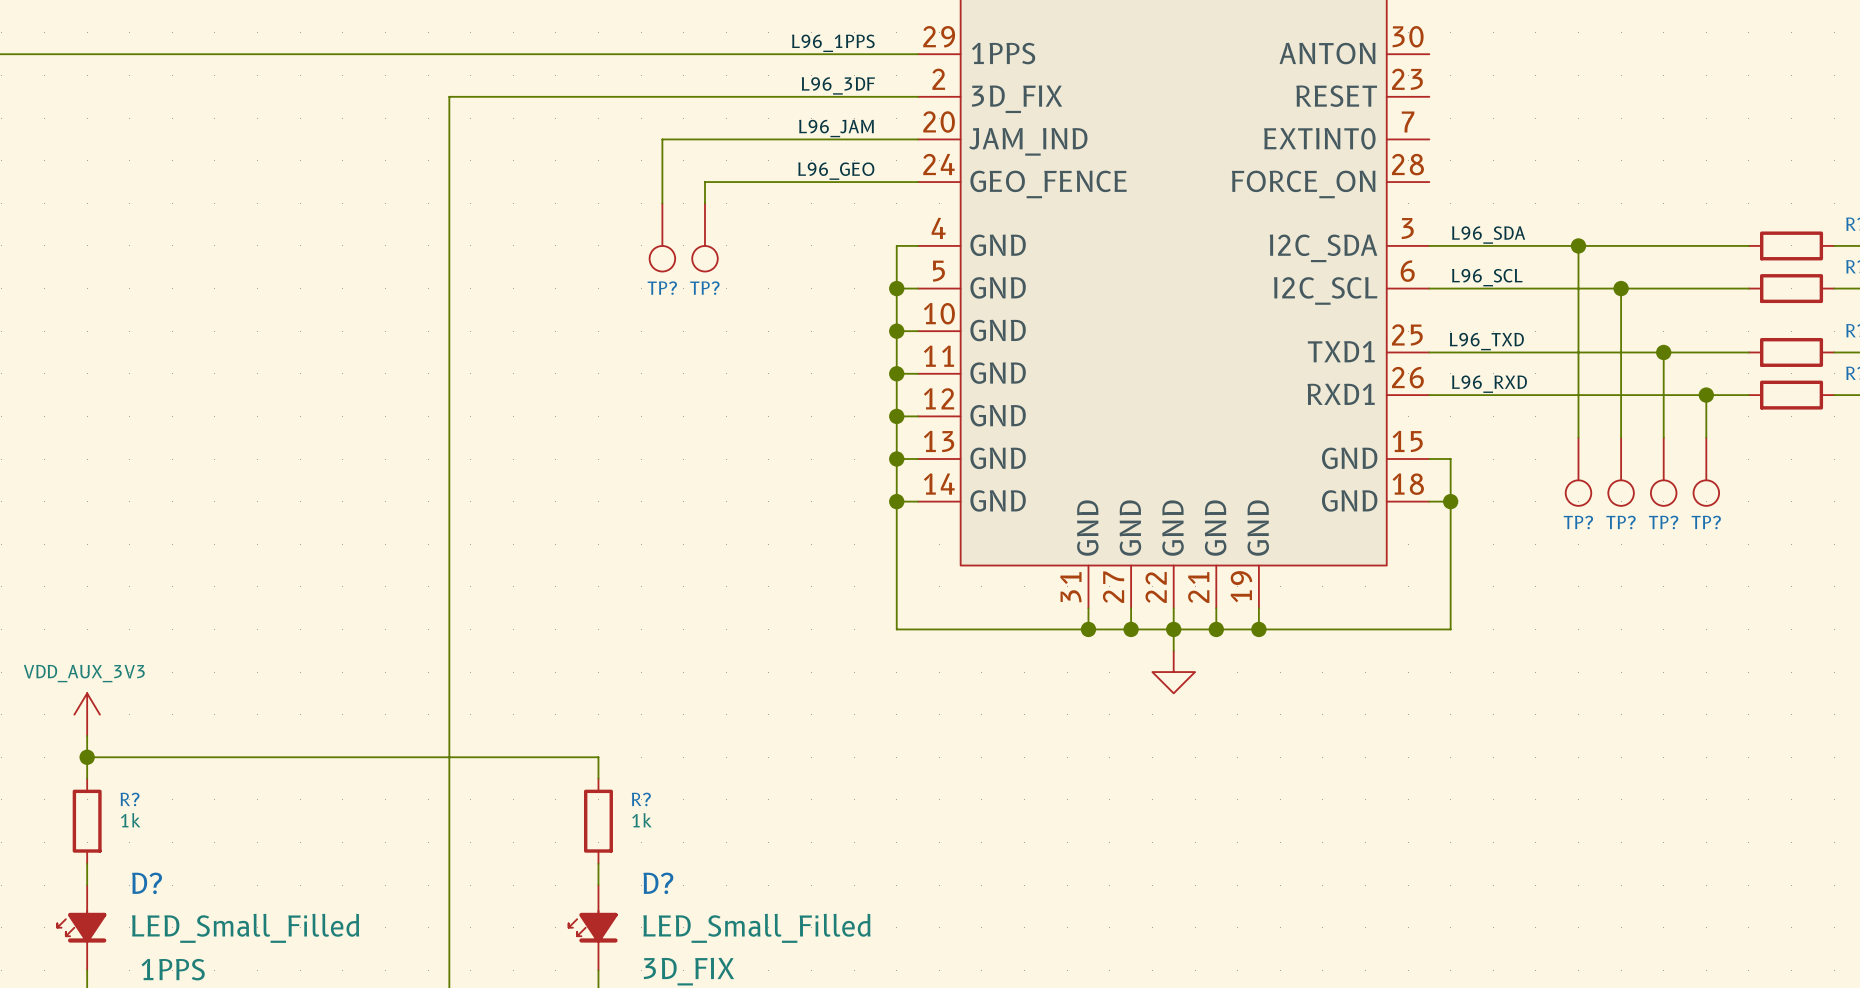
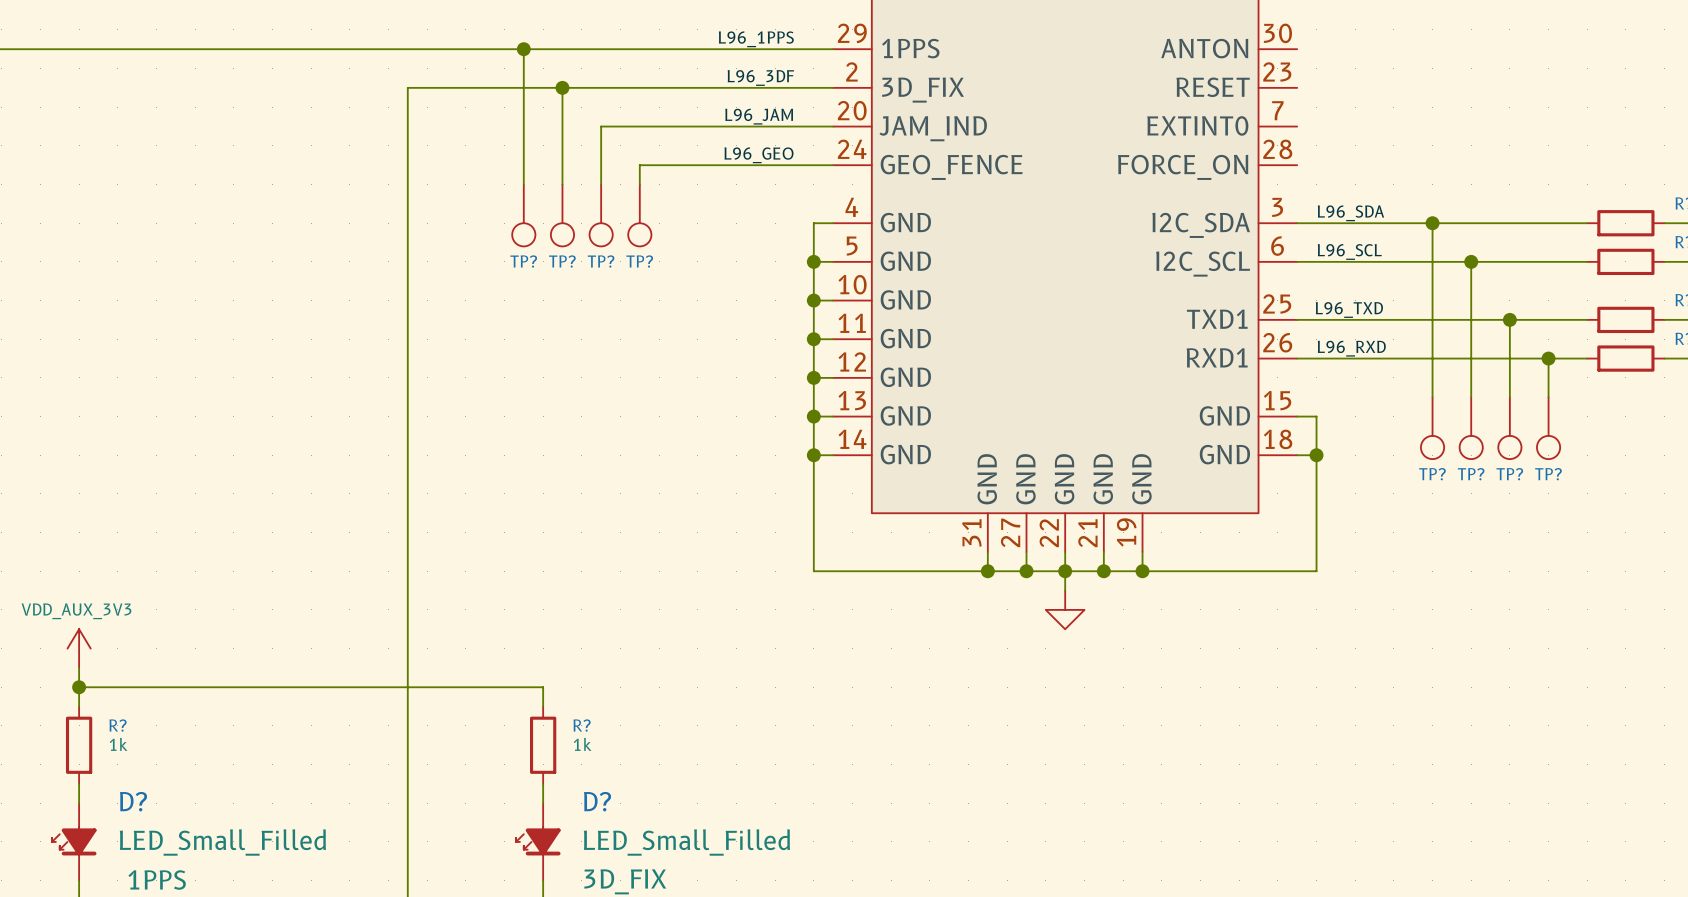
wire: none -> (523, 49) (523, 184)
junction: none -> (523, 49)
wire: none -> (562, 87) (562, 184)
junction: none -> (562, 87)
TP?: none -> (523, 215)
TP?: none -> (562, 215)

